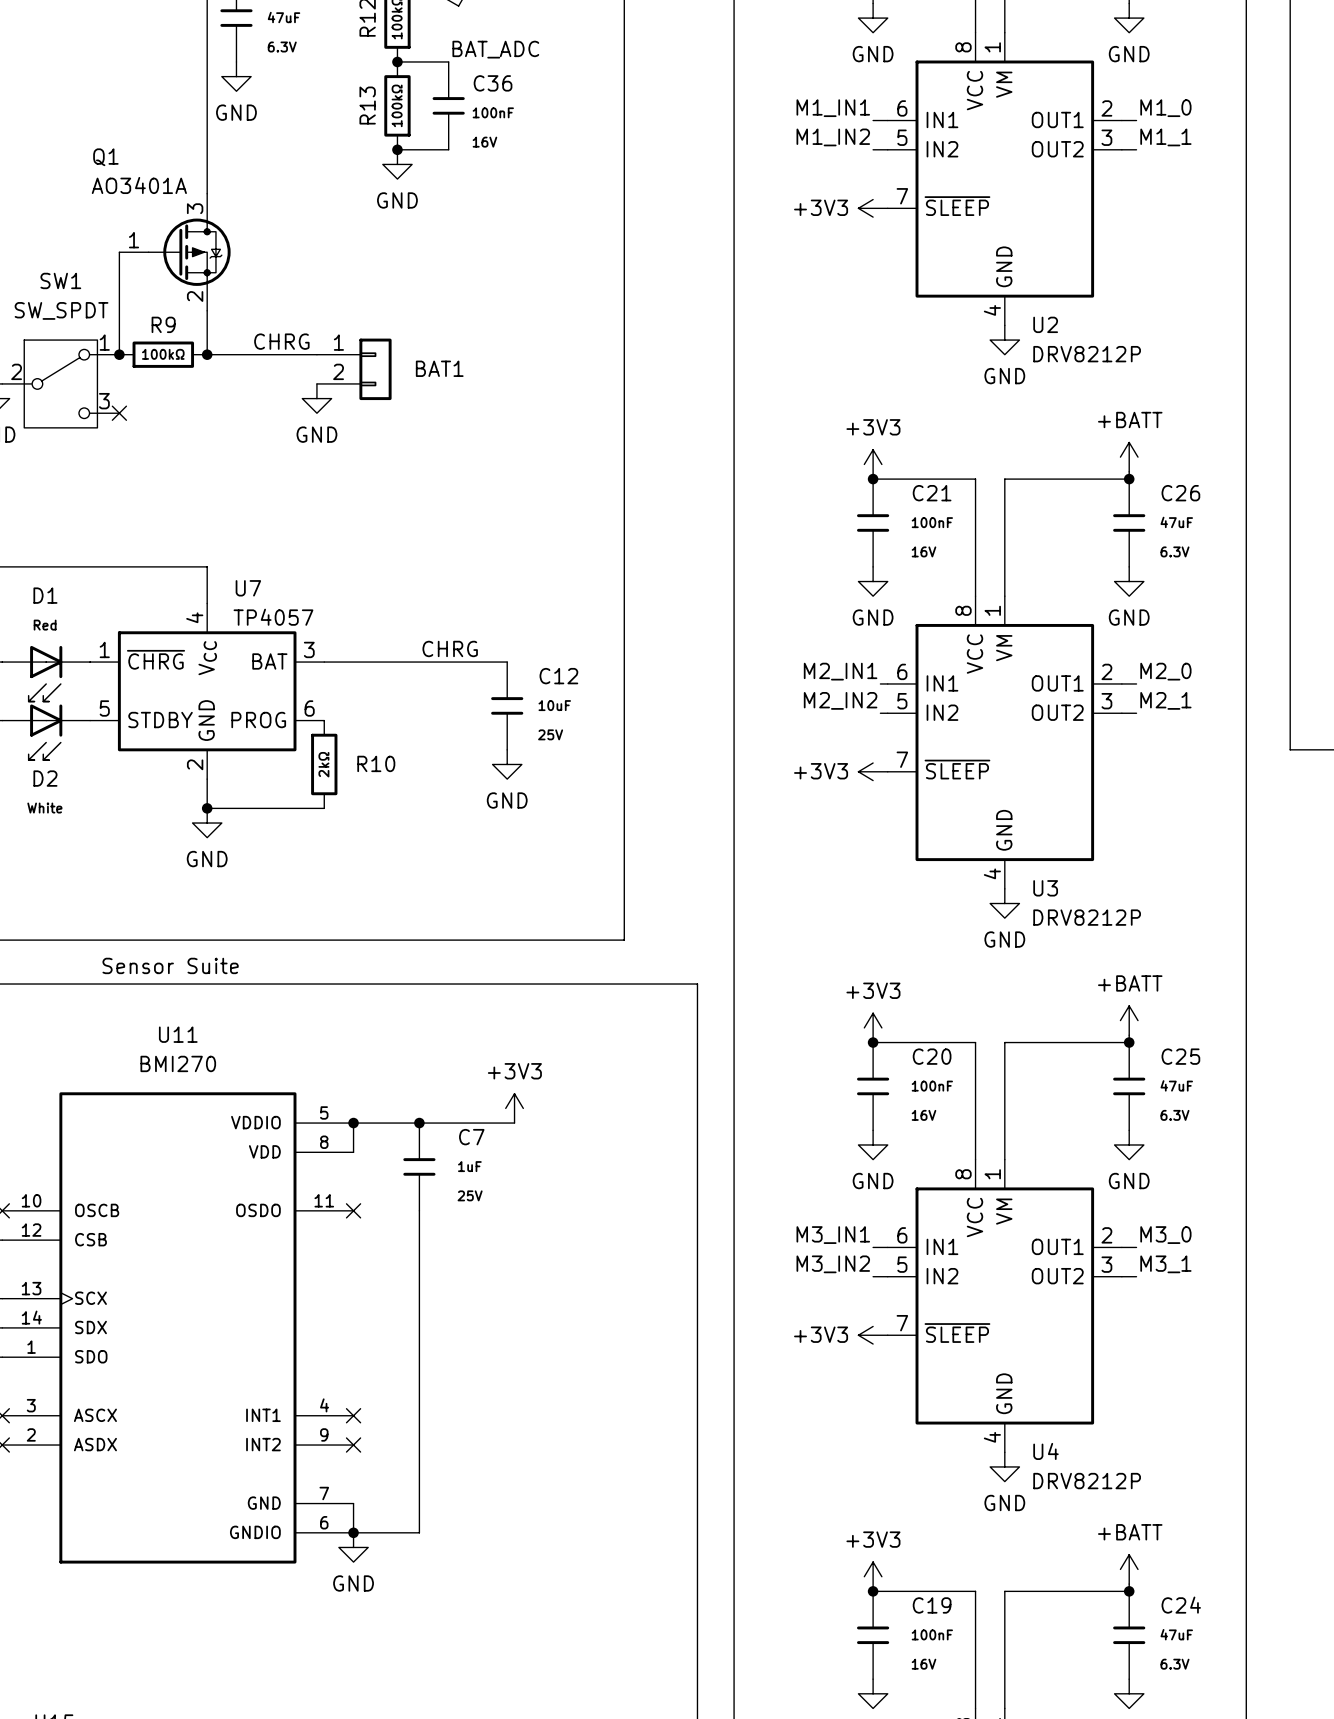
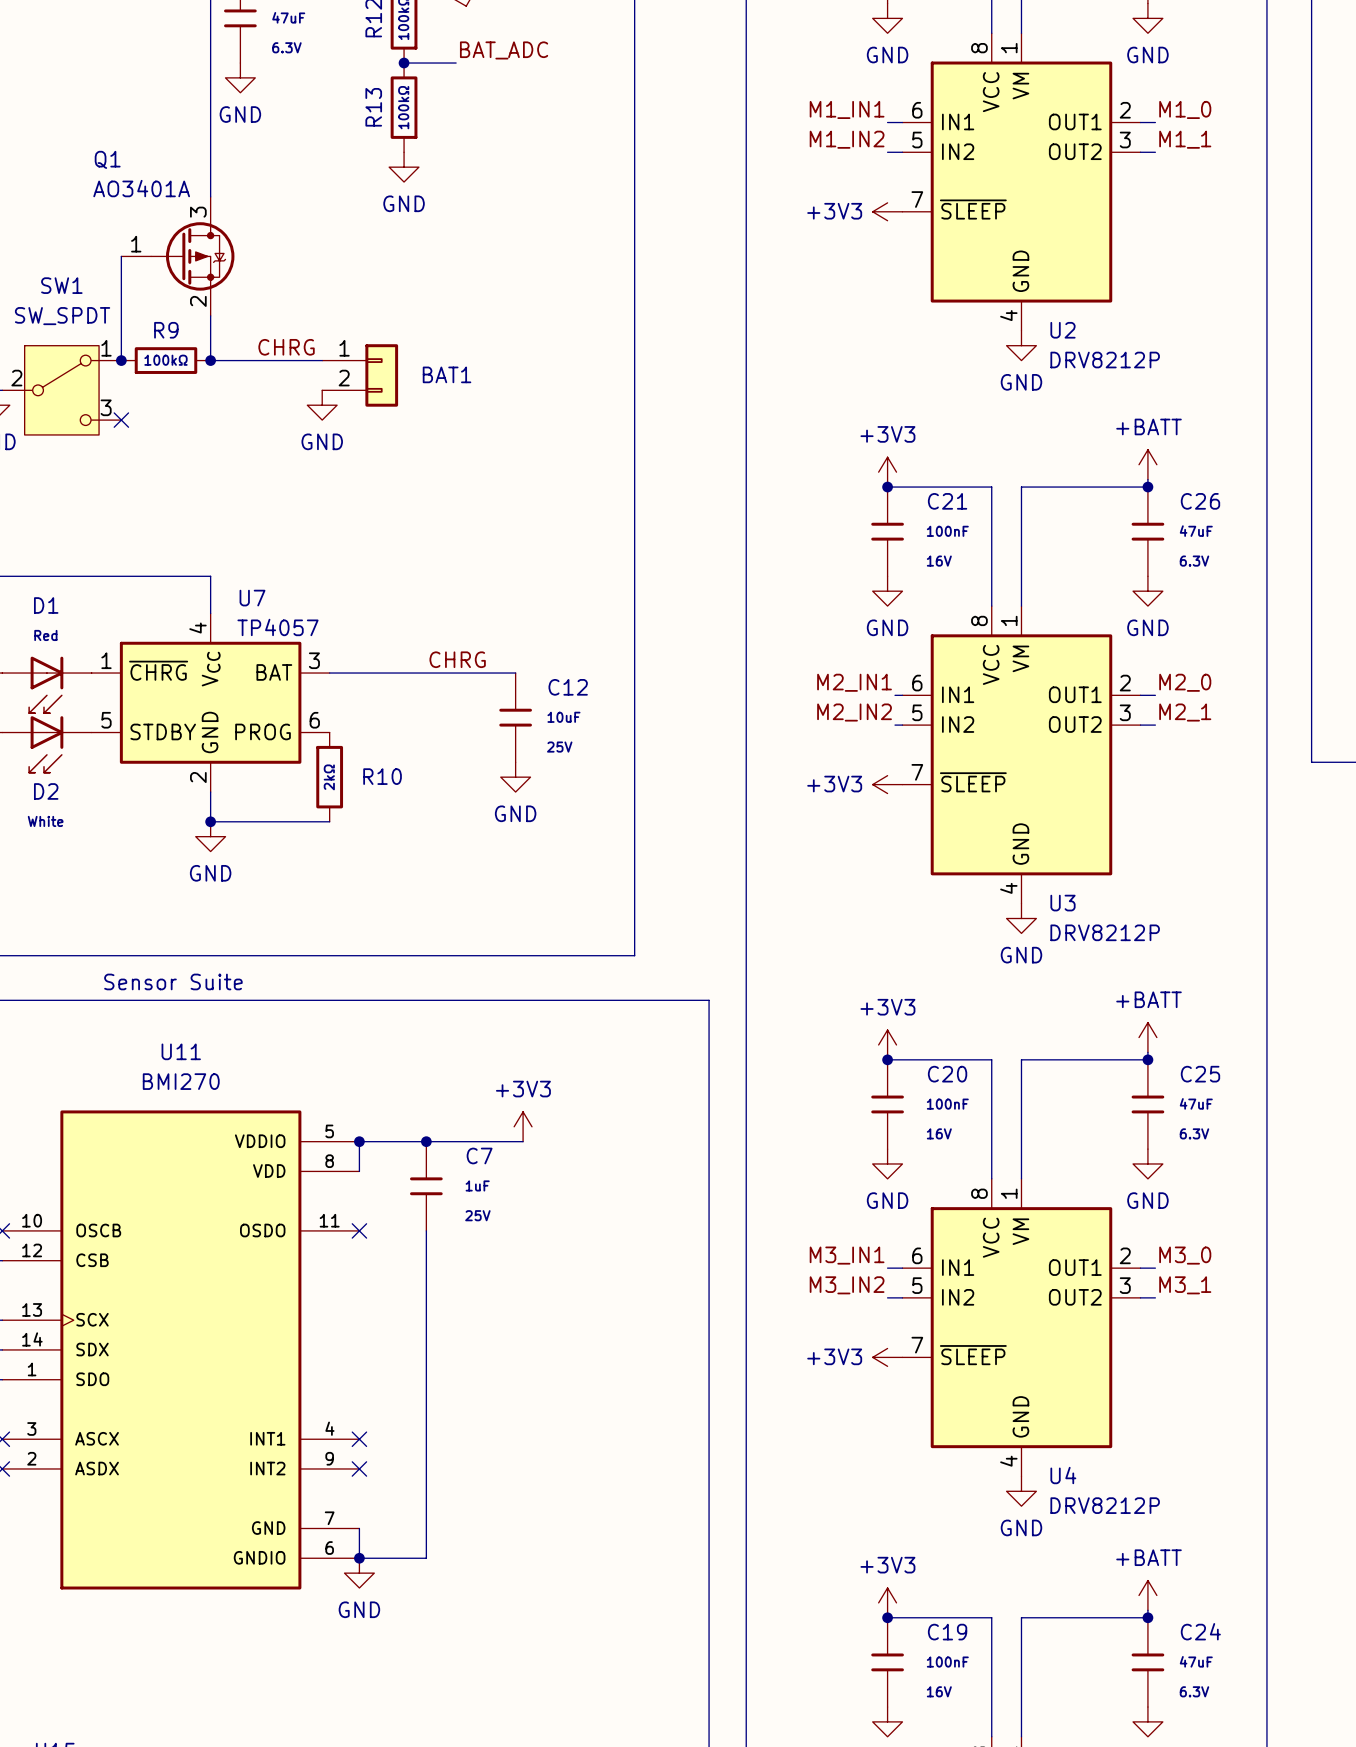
C36: 100nF (448, 105) -> none
wire: (397, 149) (448, 149) -> none
junction: (397, 149) -> none

